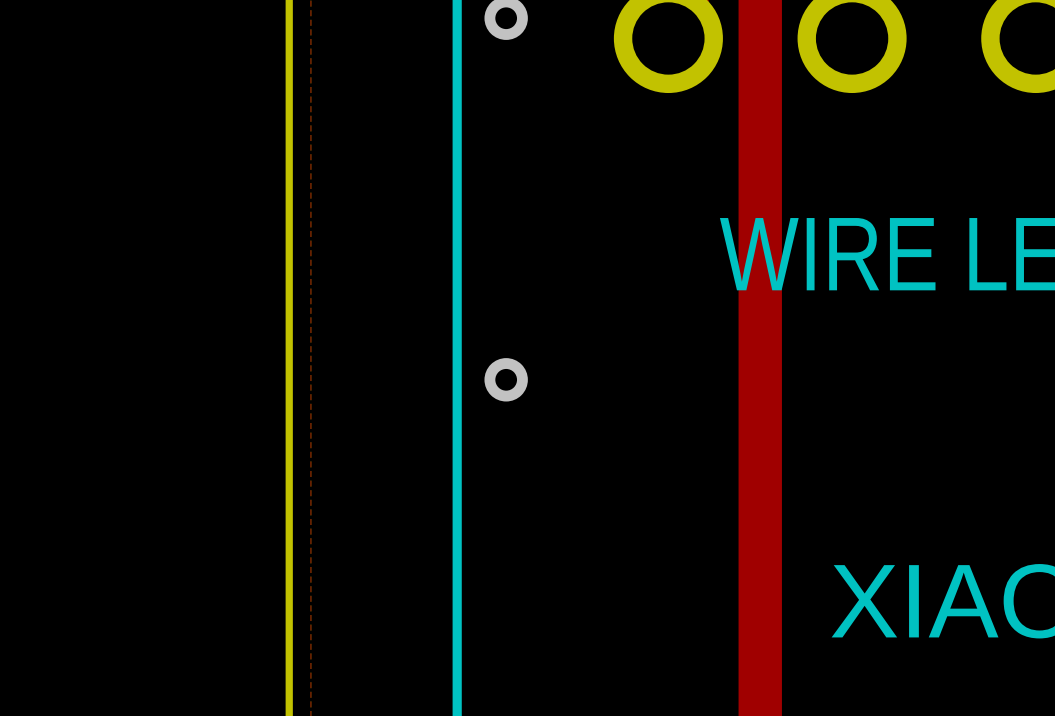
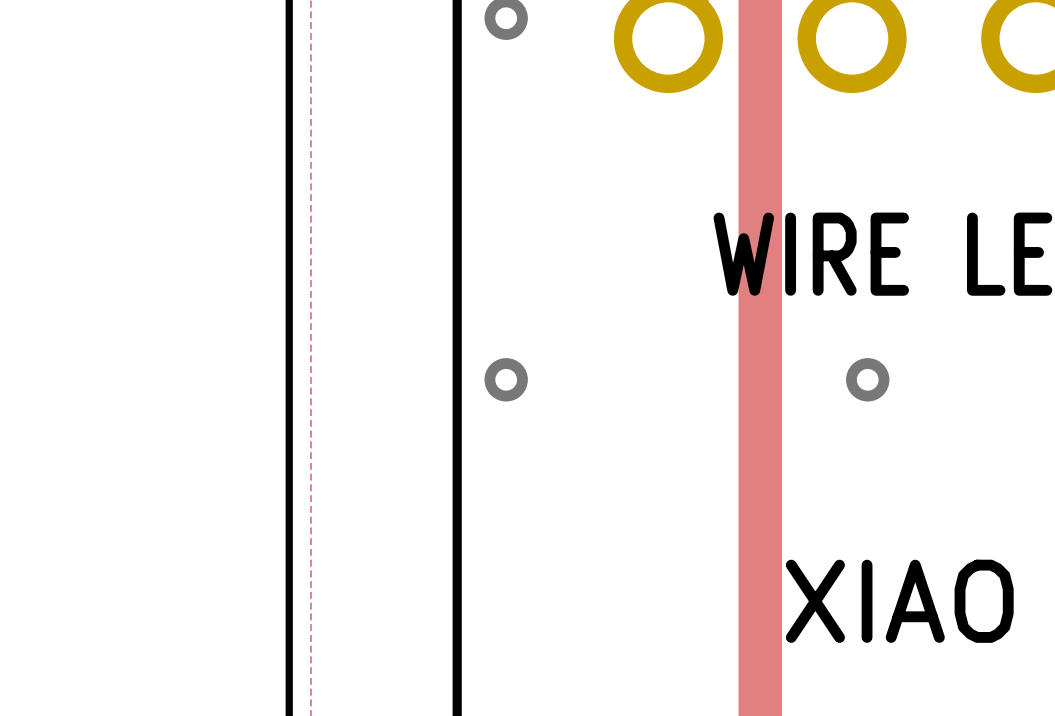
via: none -> (867, 379)

